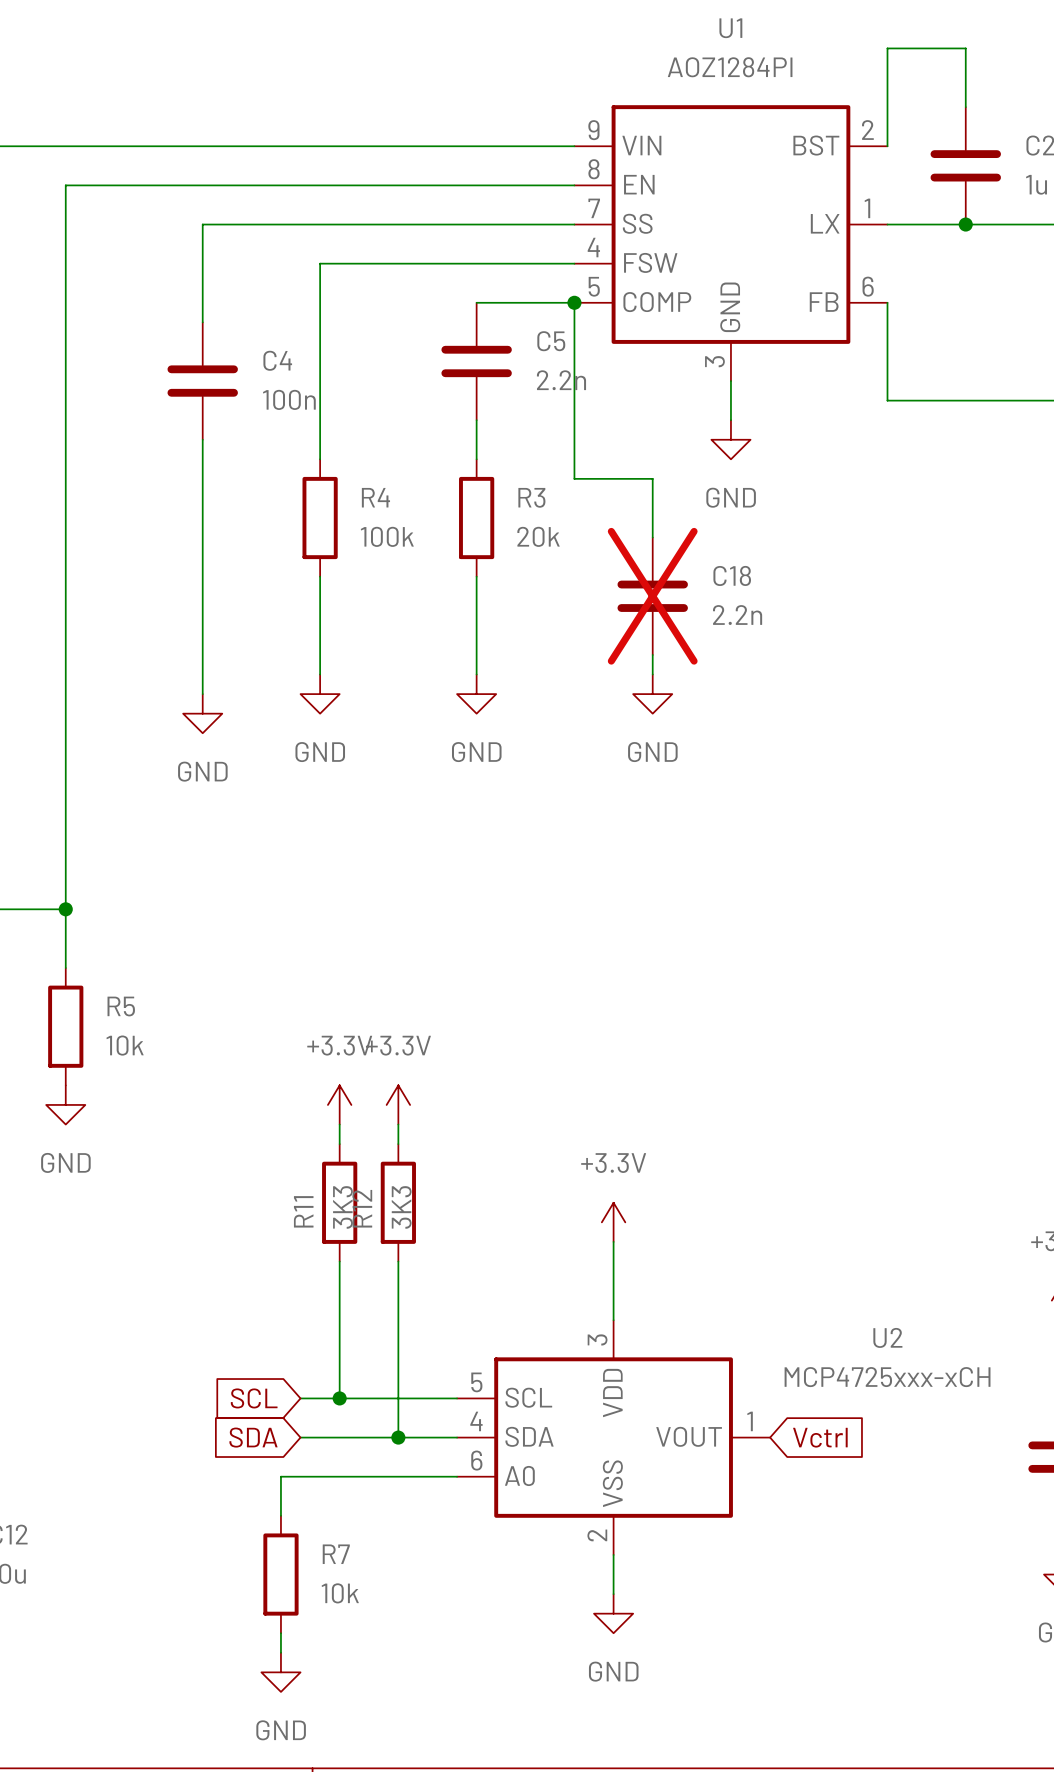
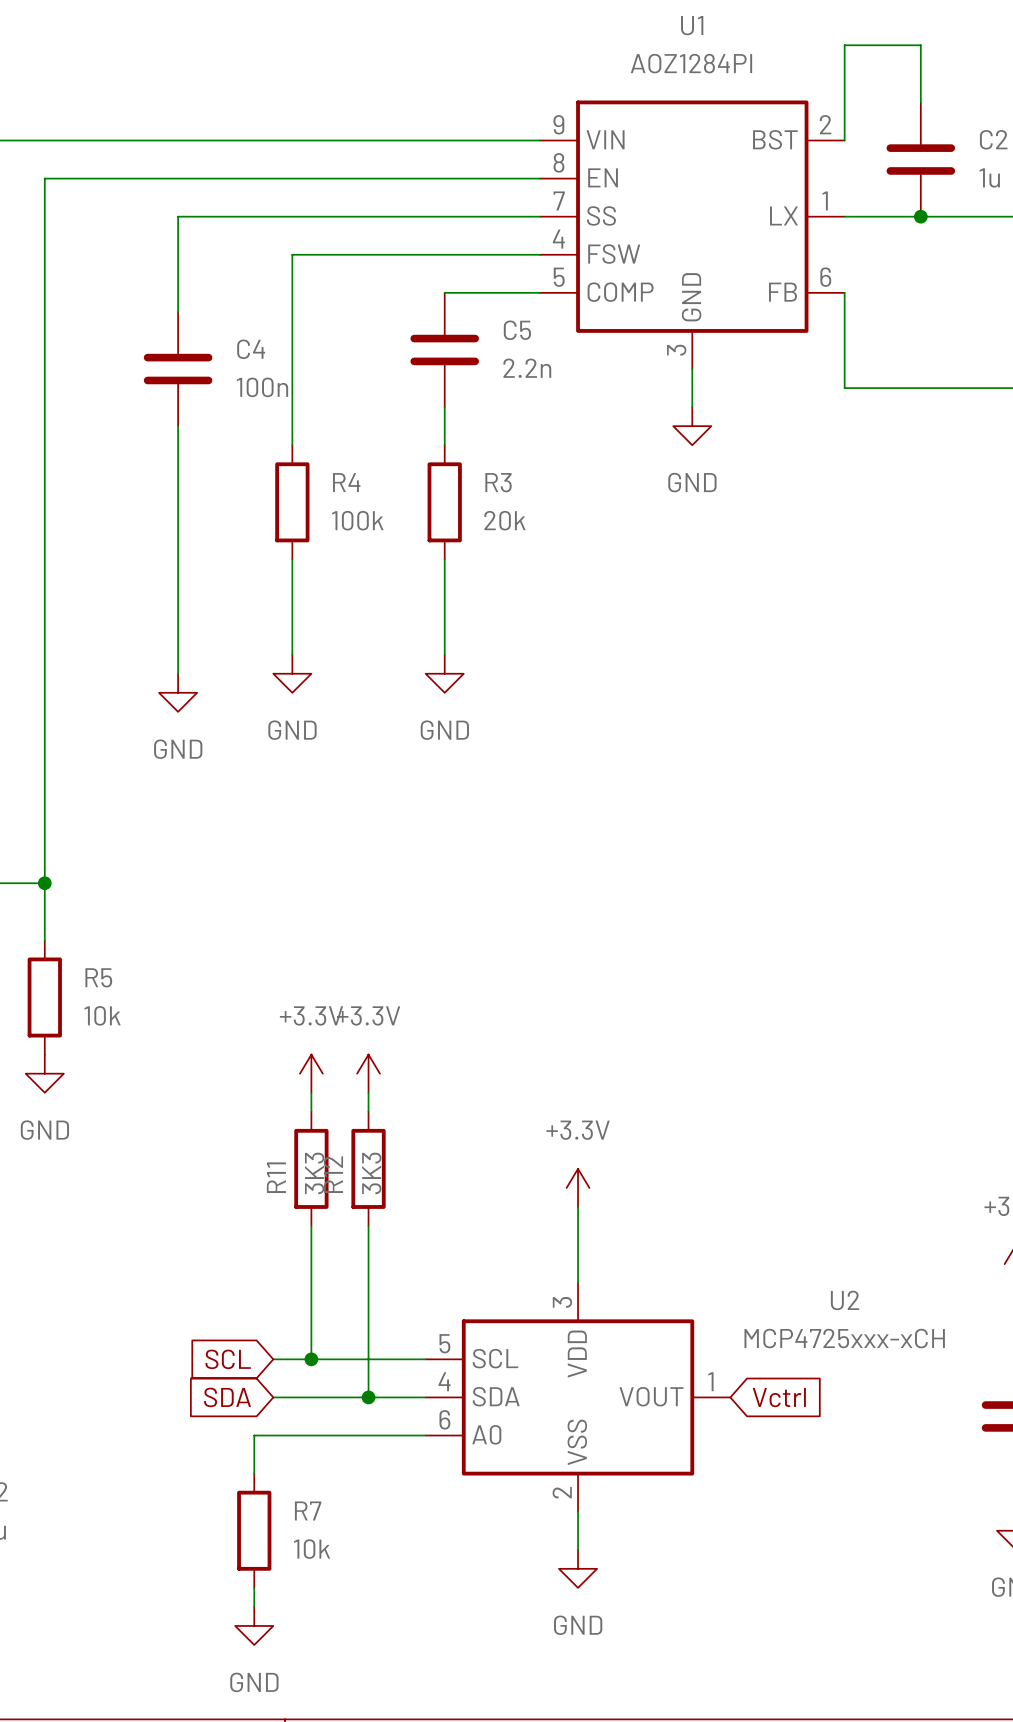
wire: (574, 302) (574, 478) (652, 478) (652, 537) -> none
junction: (574, 302) -> none
C18: 2.2n (652, 596) -> none
wire: (652, 654) (652, 674) -> none
power symbol: GND (652, 694) -> none

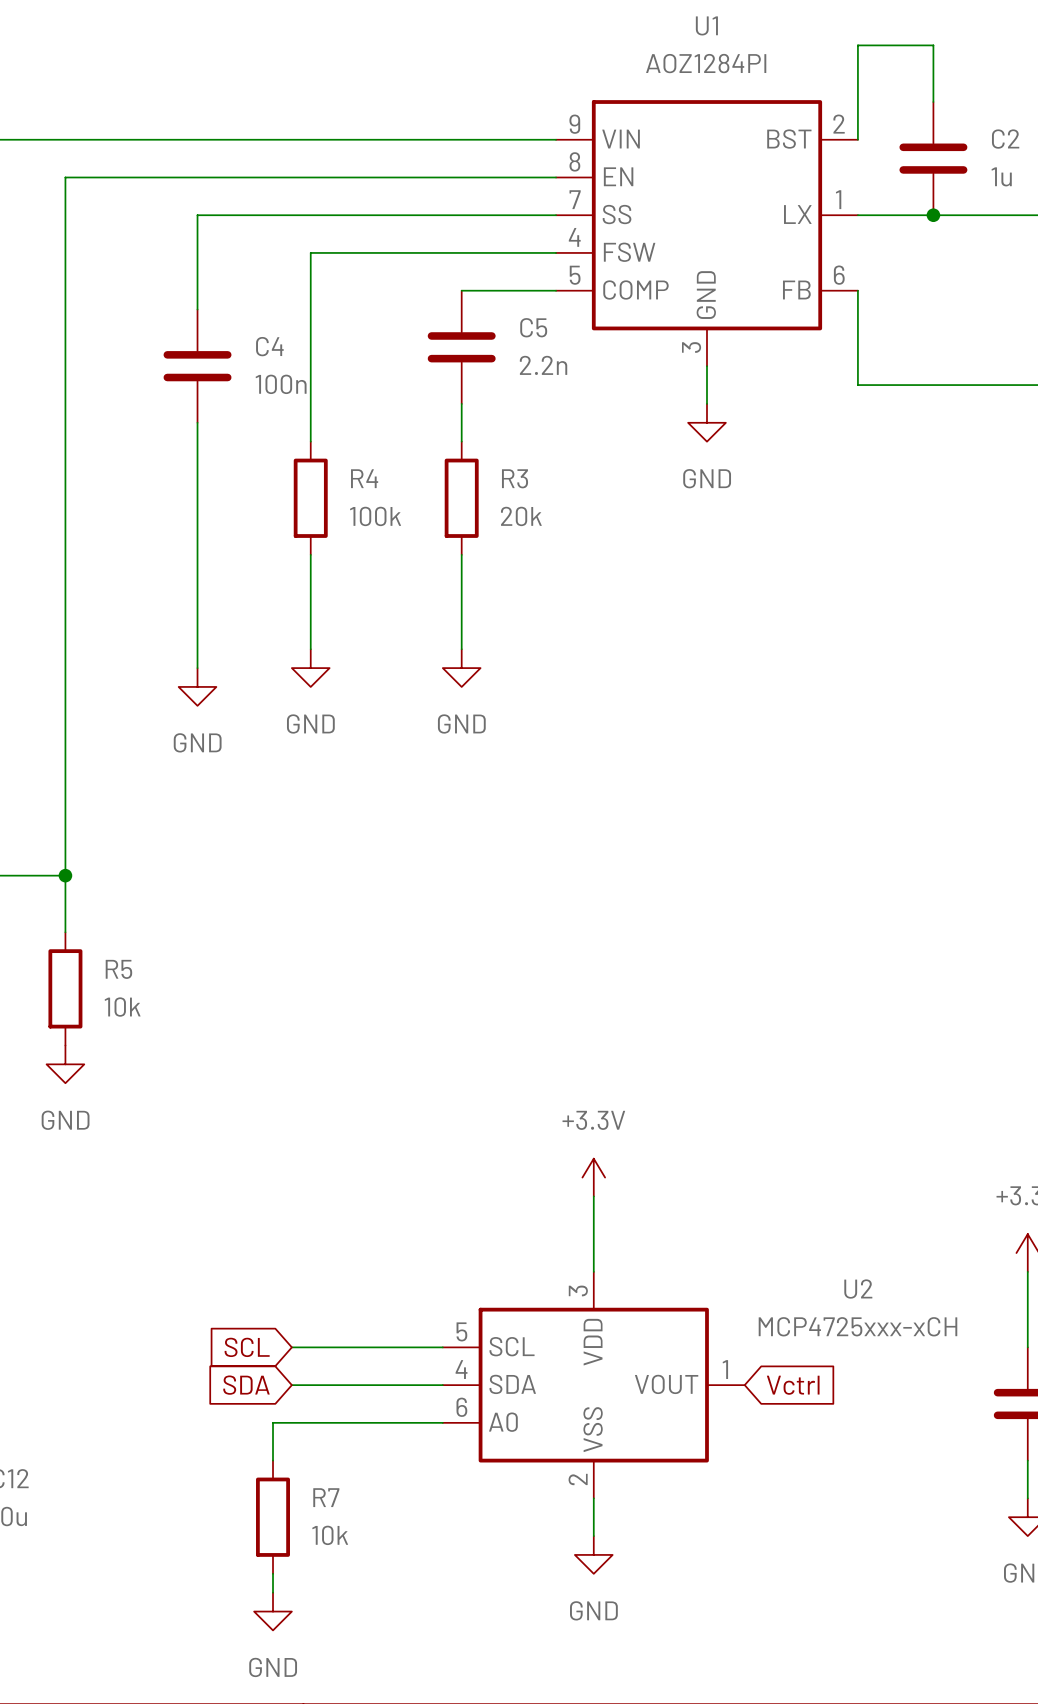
power symbol: +3.3V (311, 1073) -> none
power symbol: +3.3V (368, 1073) -> none
wire: (311, 1092) (311, 1111) -> none
wire: (368, 1092) (368, 1111) -> none
R11: 3K3 (311, 1168) -> none
R12: 3K3 (368, 1168) -> none
wire: (311, 1226) (311, 1359) -> none
wire: (368, 1226) (368, 1397) -> none
junction: (311, 1359) -> none
junction: (368, 1397) -> none

